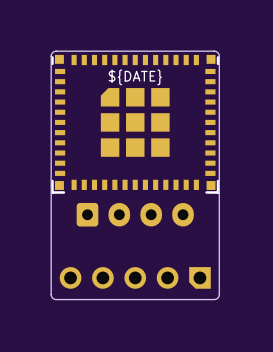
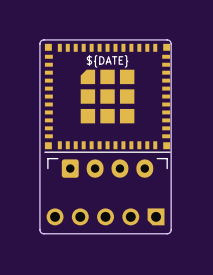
part footprint: [51, 54, 220, 194] -> [44, 43, 171, 153]
part footprint: [76, 202, 194, 227] -> [47, 158, 168, 178]

